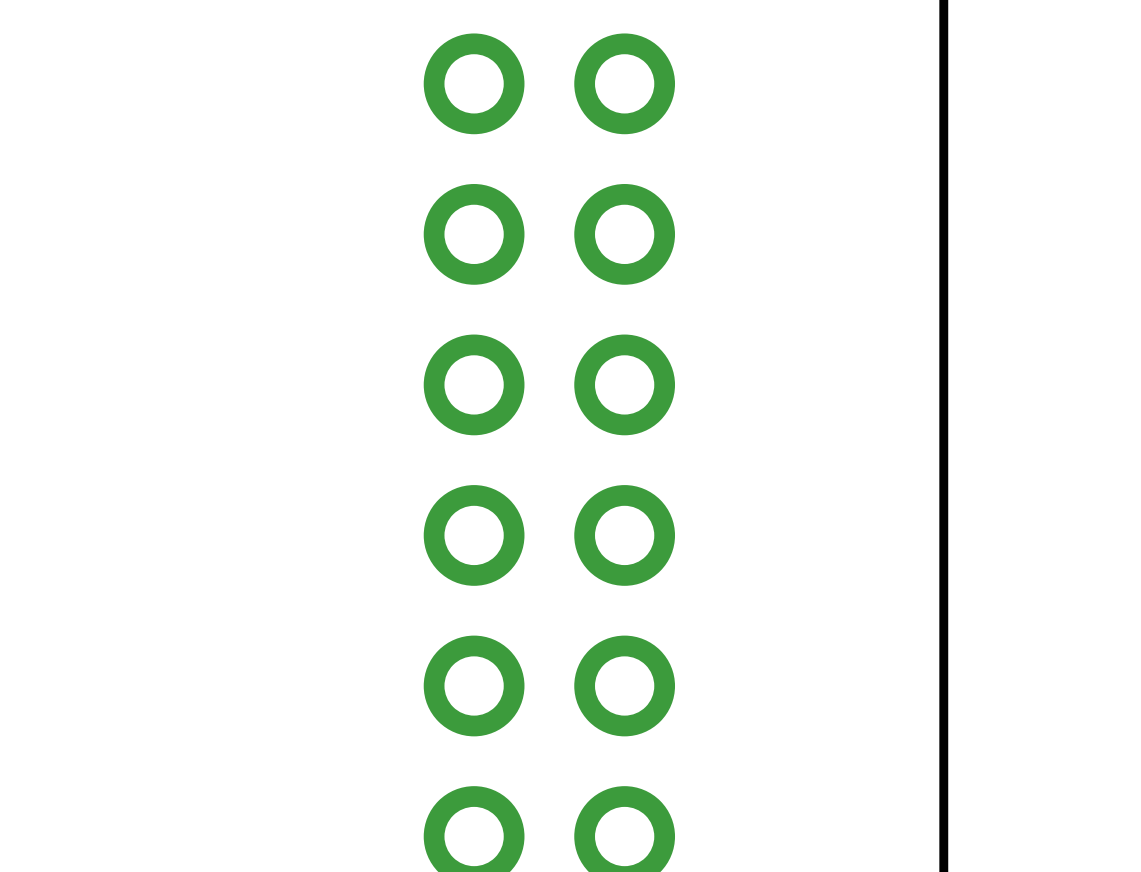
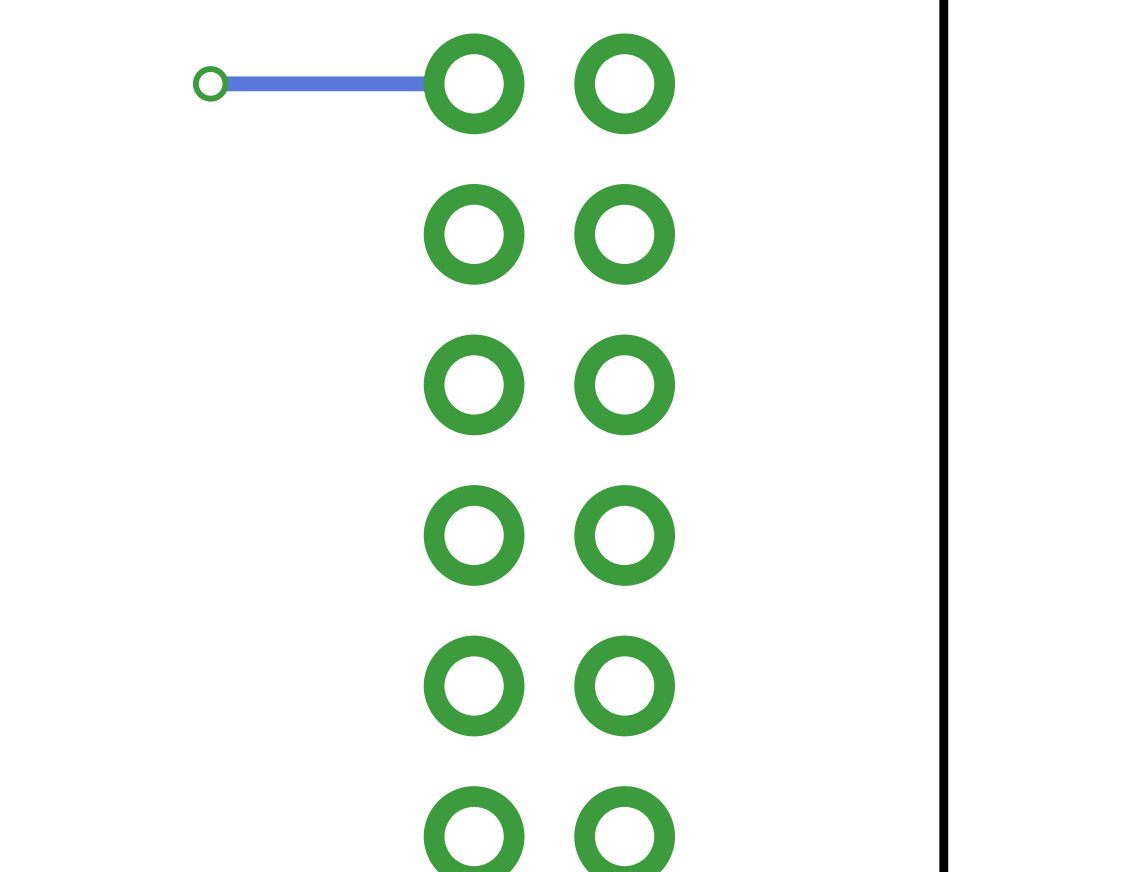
via: none -> (210, 83)
track: none -> (474, 83) (210, 83)

